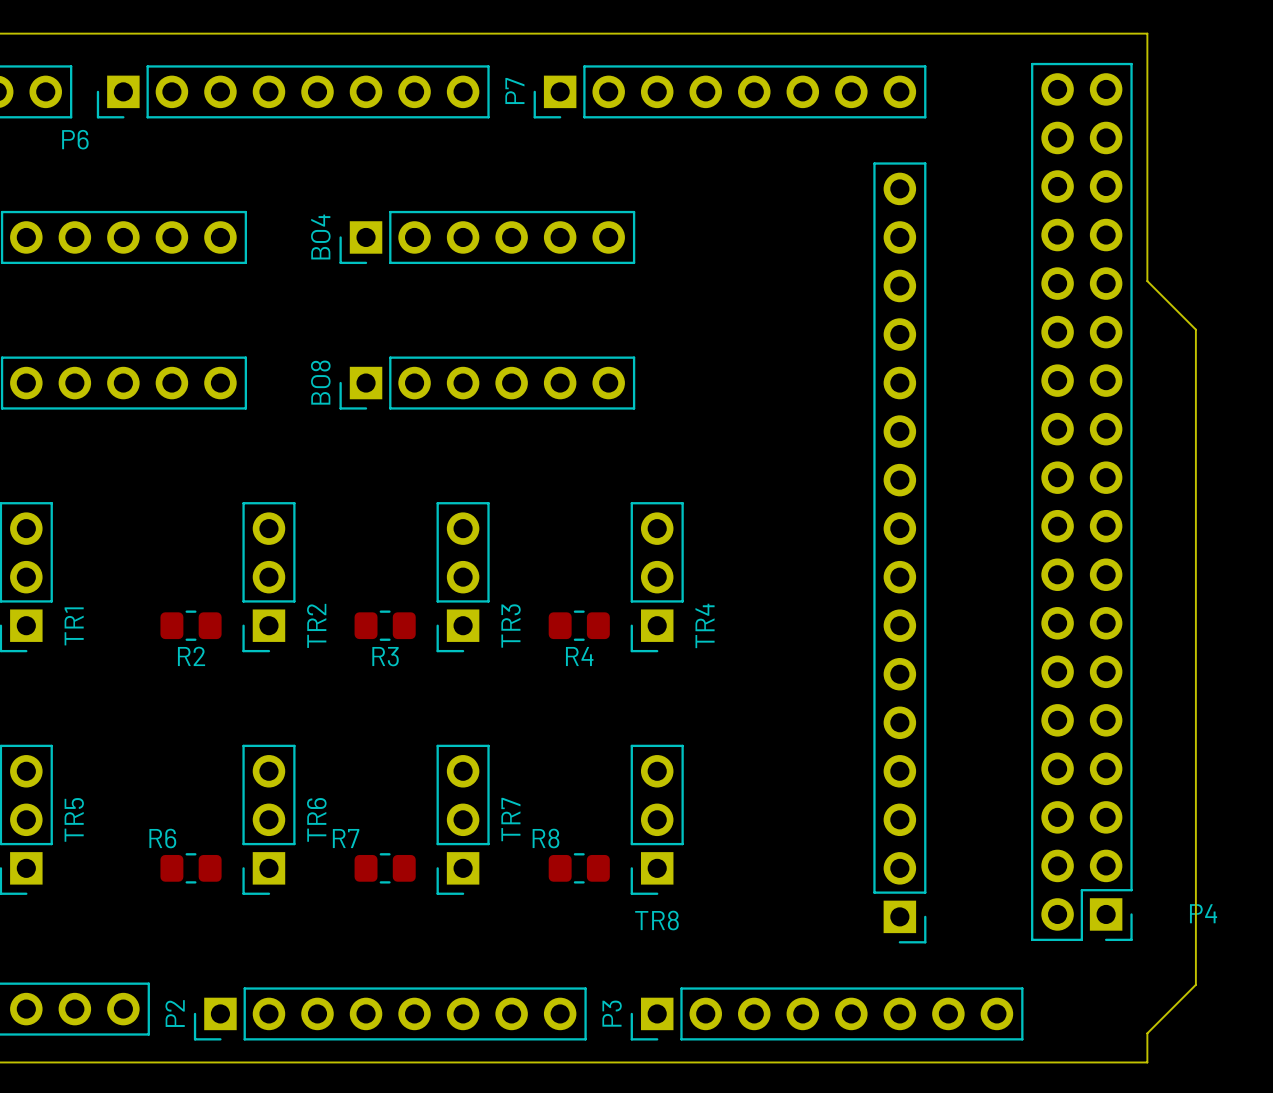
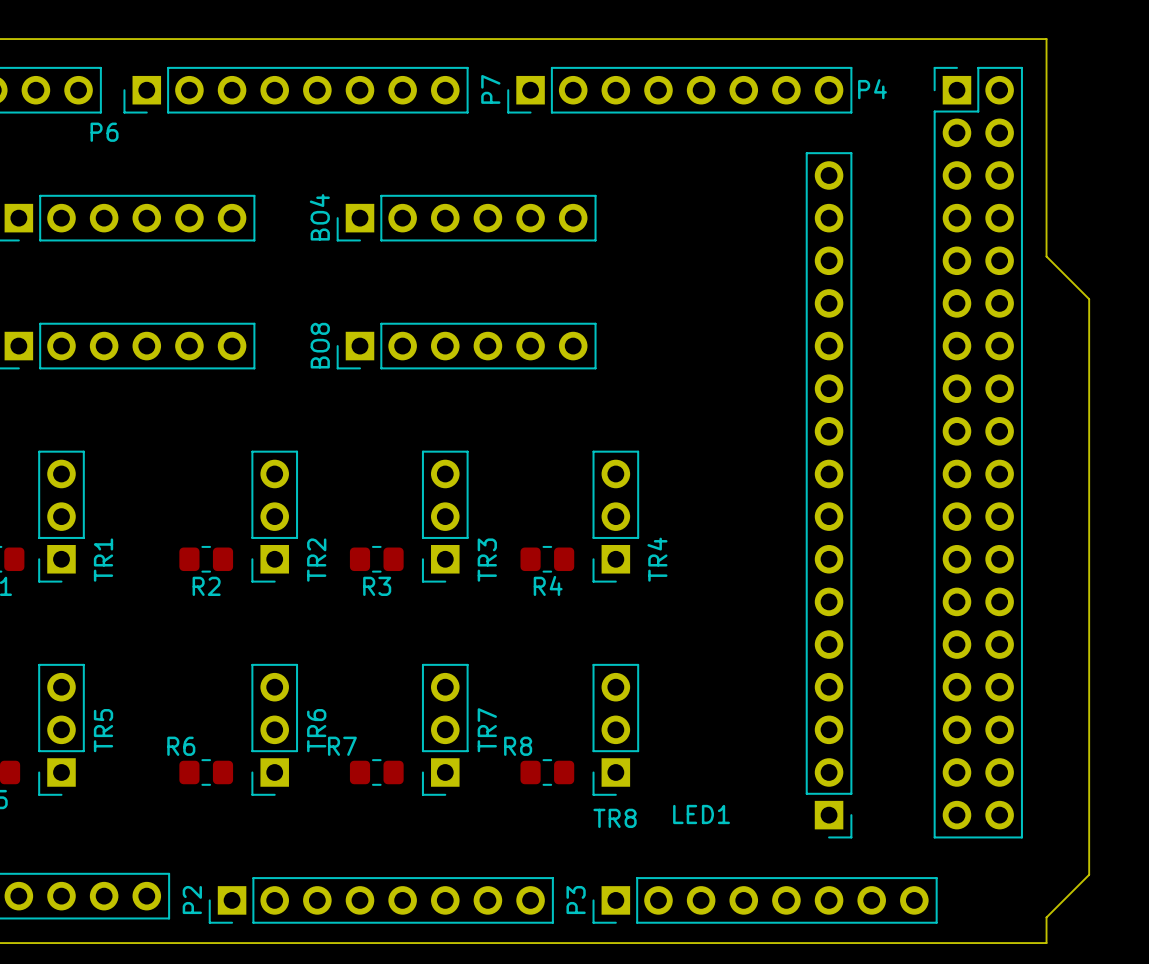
P4 rotation: 0° (1081, 501) -> 180° (978, 452)
LED1 name: none -> LED1 (701, 814)

